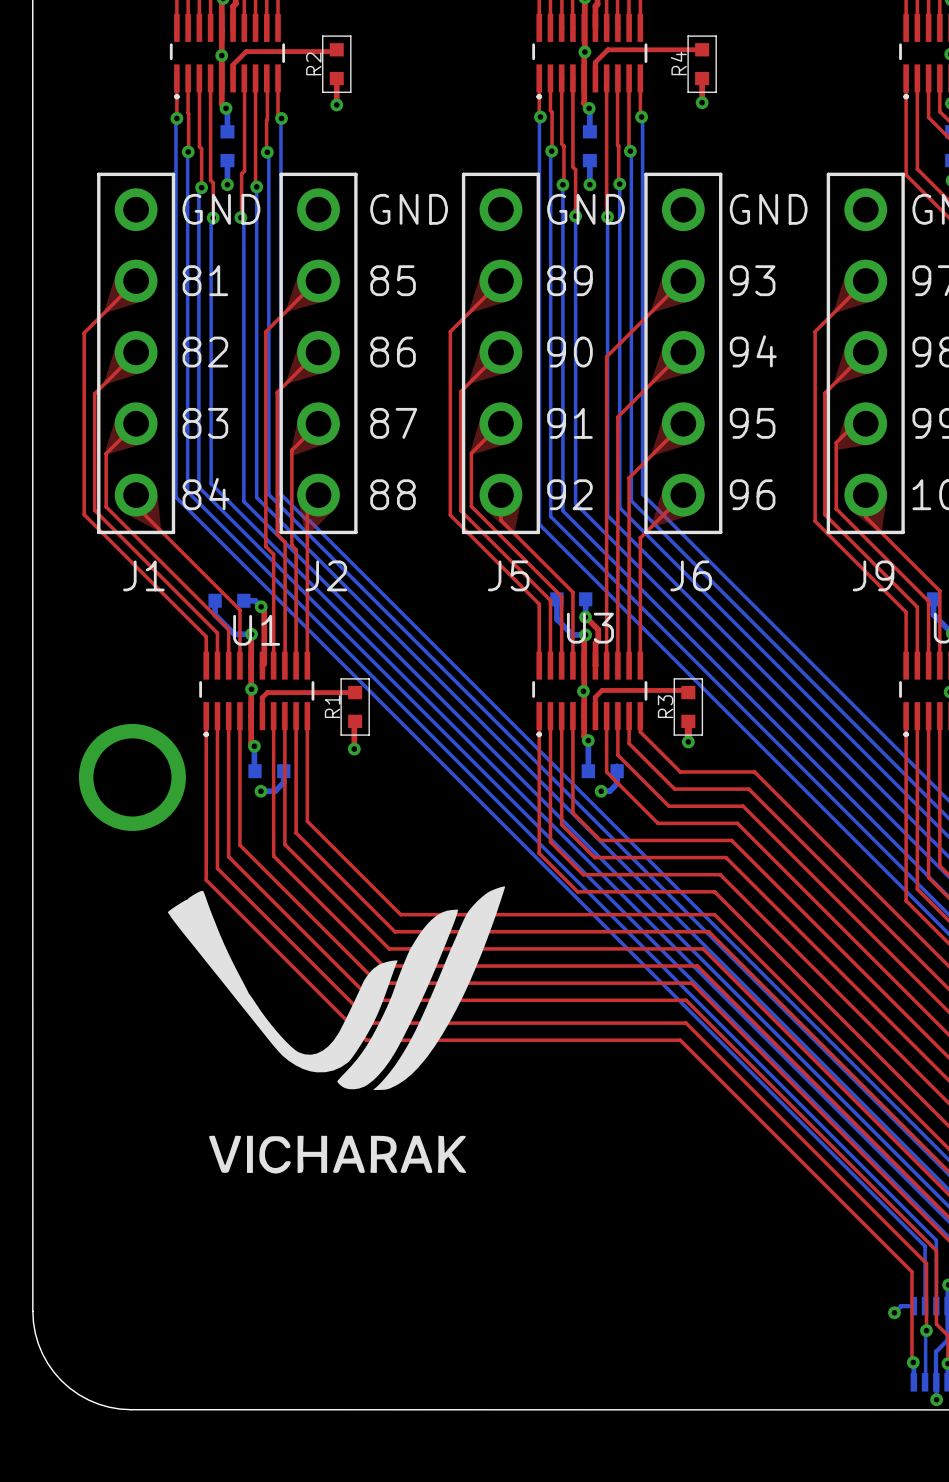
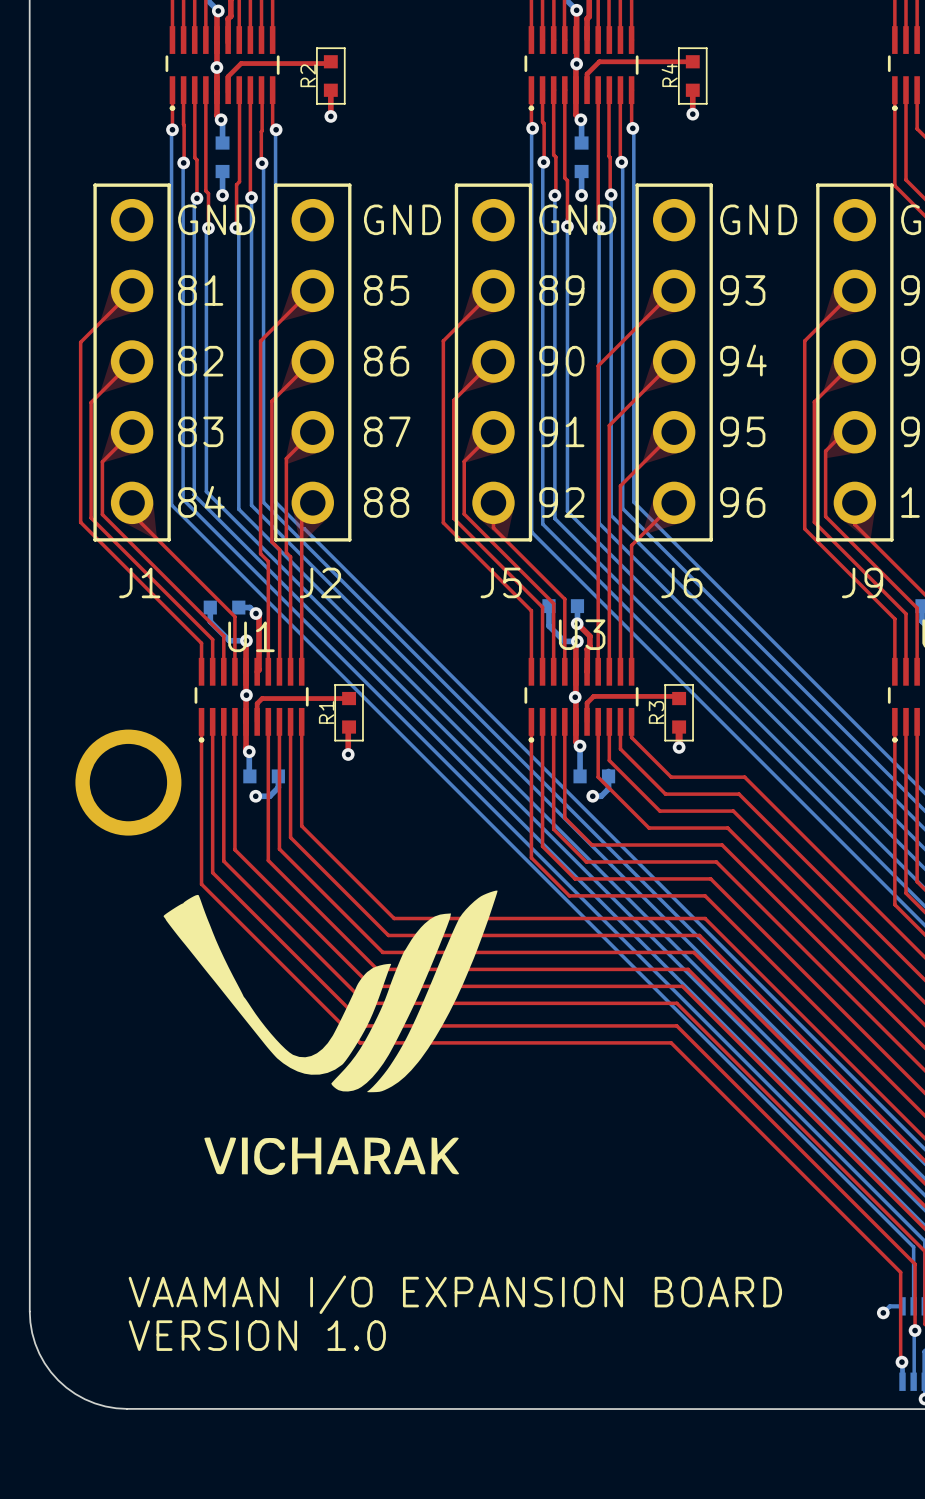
text: none -> VAAMAN I/O EXPANSION BOARD (455, 1294)
text: none -> VERSION 1.0 (257, 1335)

